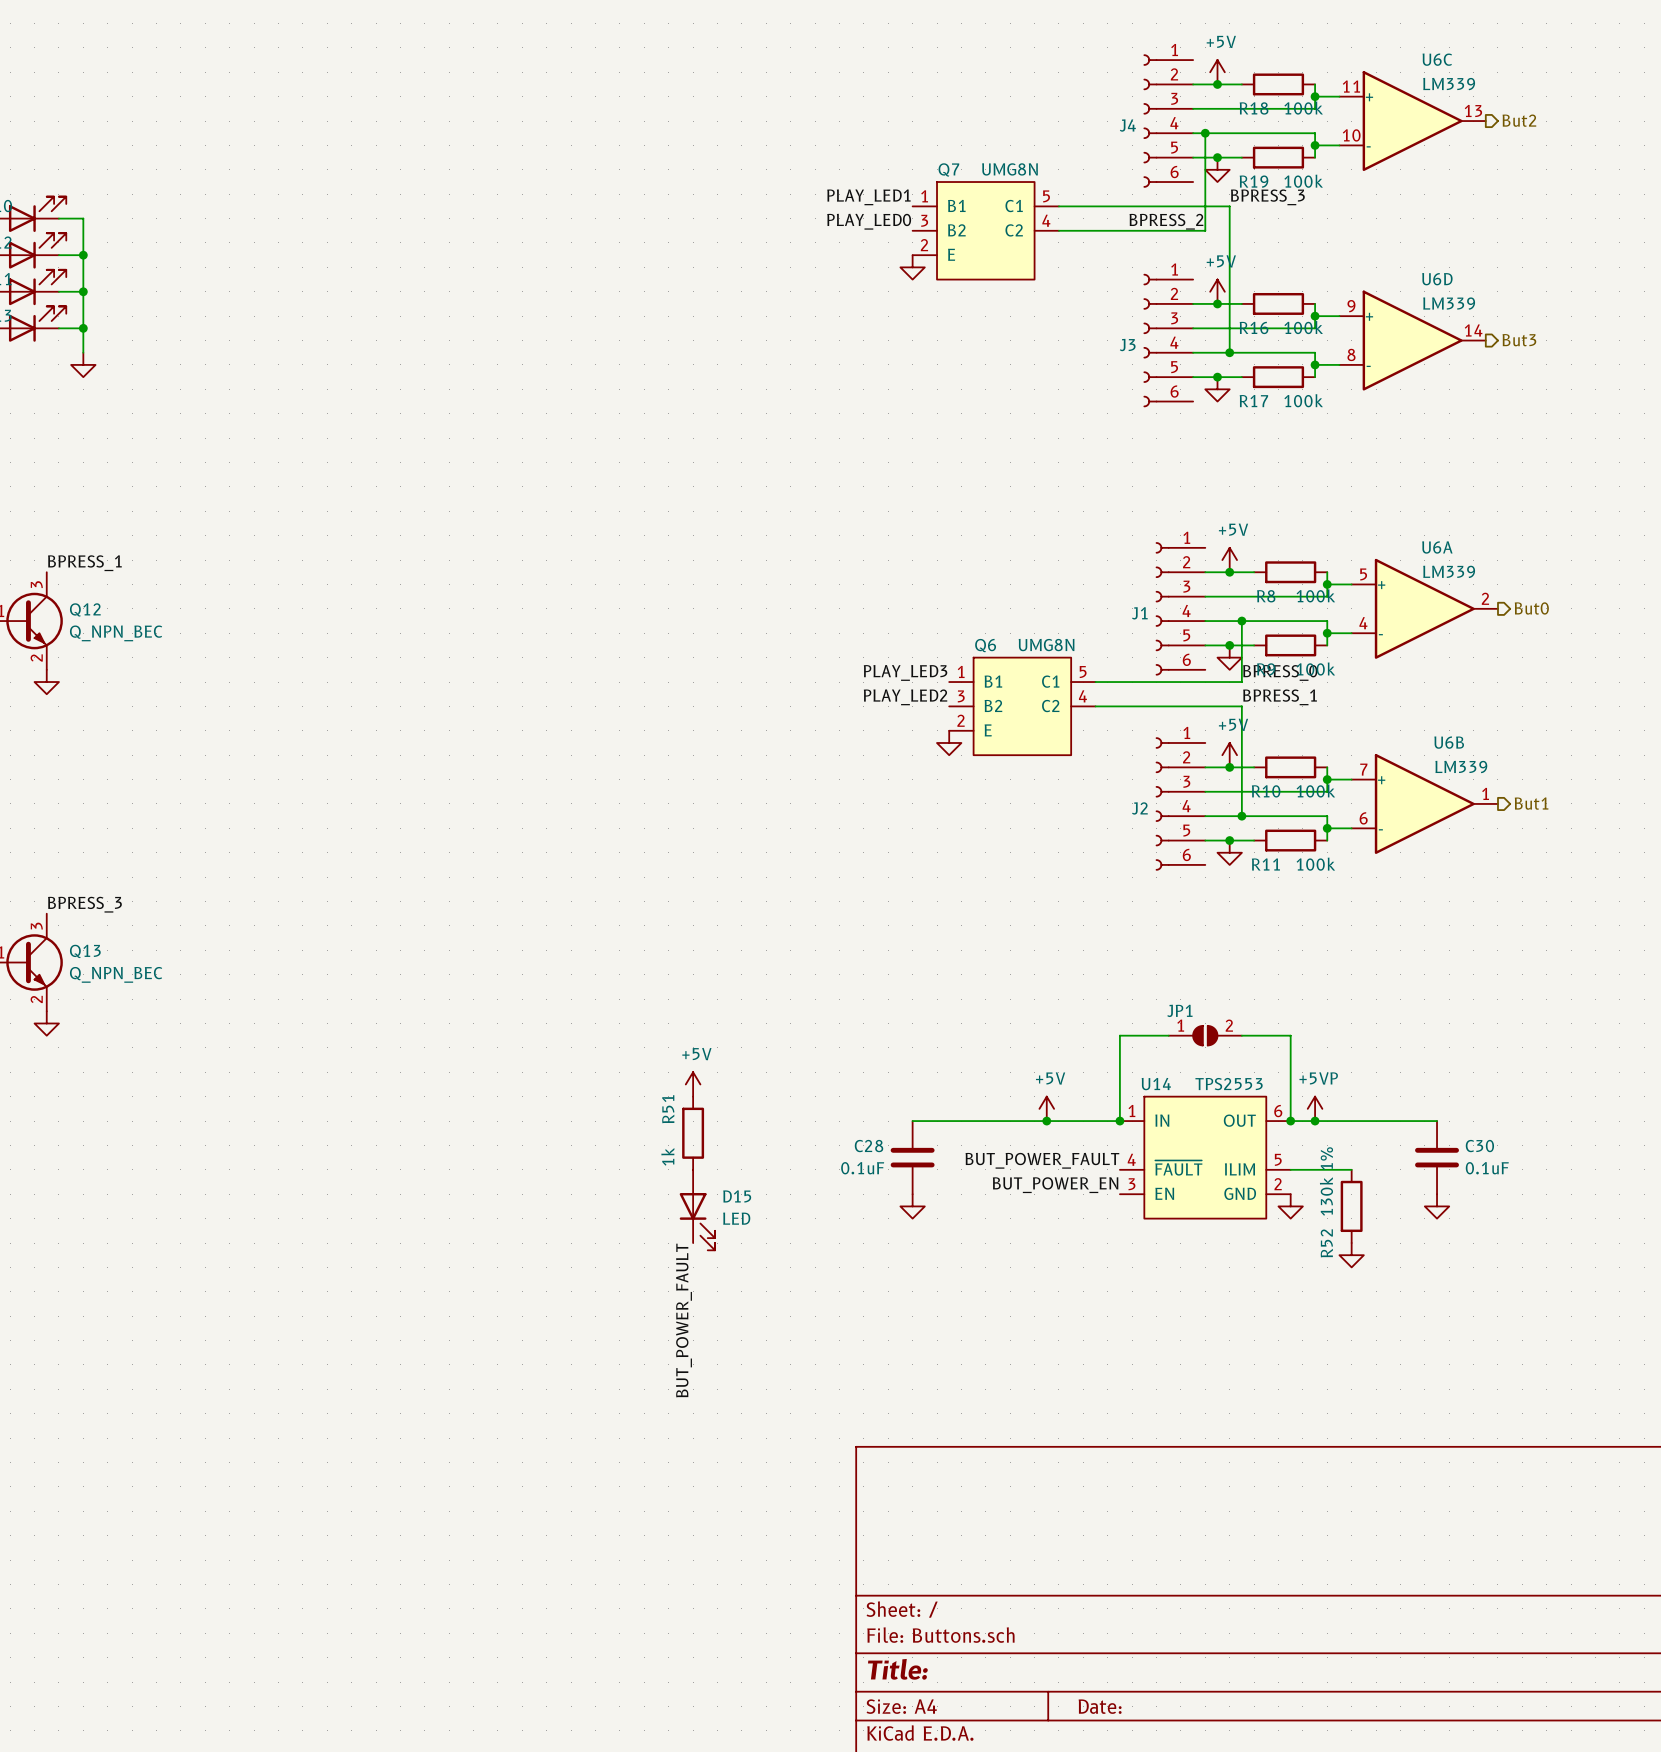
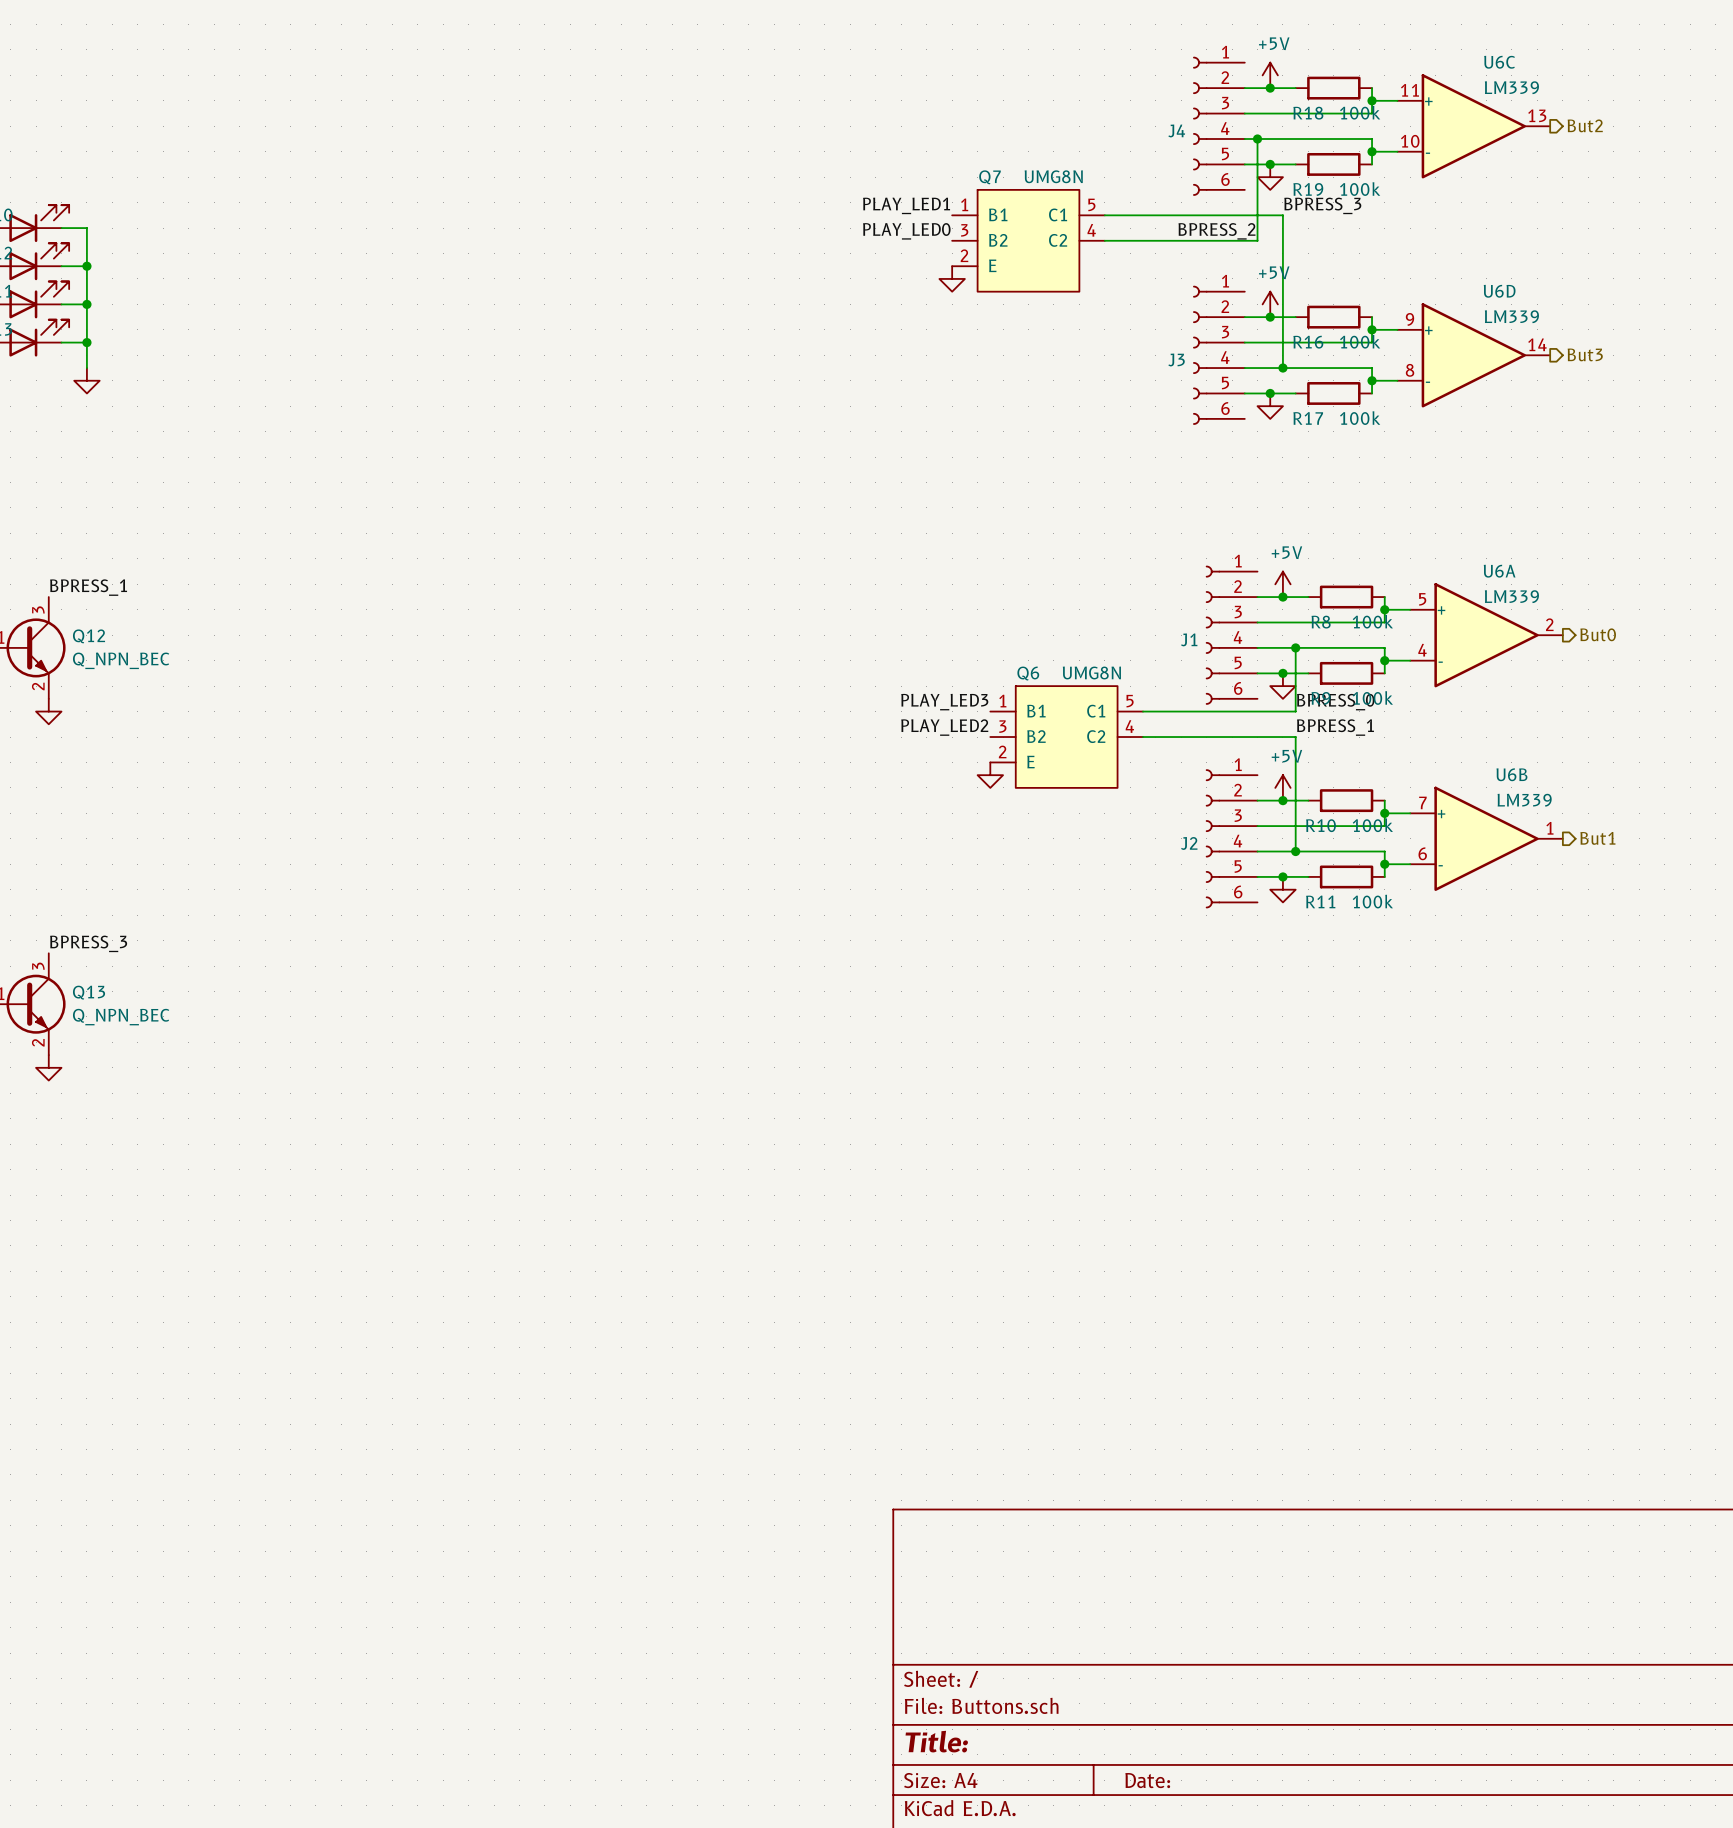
wire: (1168, 1035) (1119, 1035) (1119, 1121) (912, 1121) -> none
JP1: (1205, 1035) -> none
wire: (1241, 1035) (1290, 1035) (1290, 1121) (1437, 1121) -> none
power symbol: +5V (693, 1084) -> none
power symbol: +5V (1046, 1108) -> none
power symbol: +5VP (1315, 1108) -> none
junction: (1046, 1121) -> none
junction: (1119, 1121) -> none
junction: (1290, 1121) -> none
junction: (1315, 1121) -> none
R51: 1k (693, 1133) -> none
C28: 0.1uF (912, 1157) -> none
U14: TPS2553 (1205, 1157) -> none
C30: 0.1uF (1437, 1157) -> none
label: BUT_POWER_FAULT (1042, 1160) -> none
wire: (1290, 1169) (1351, 1169) -> none
label: BUT_POWER_EN (1055, 1185) -> none
power symbol: (912, 1206) -> none
power symbol: (1290, 1206) -> none
R52: 130k 1% (1351, 1206) -> none
power symbol: (1437, 1206) -> none
D15: LED (697, 1210) -> none
power symbol: (1351, 1255) -> none
label: BUT_POWER_FAULT (684, 1320) -> none

